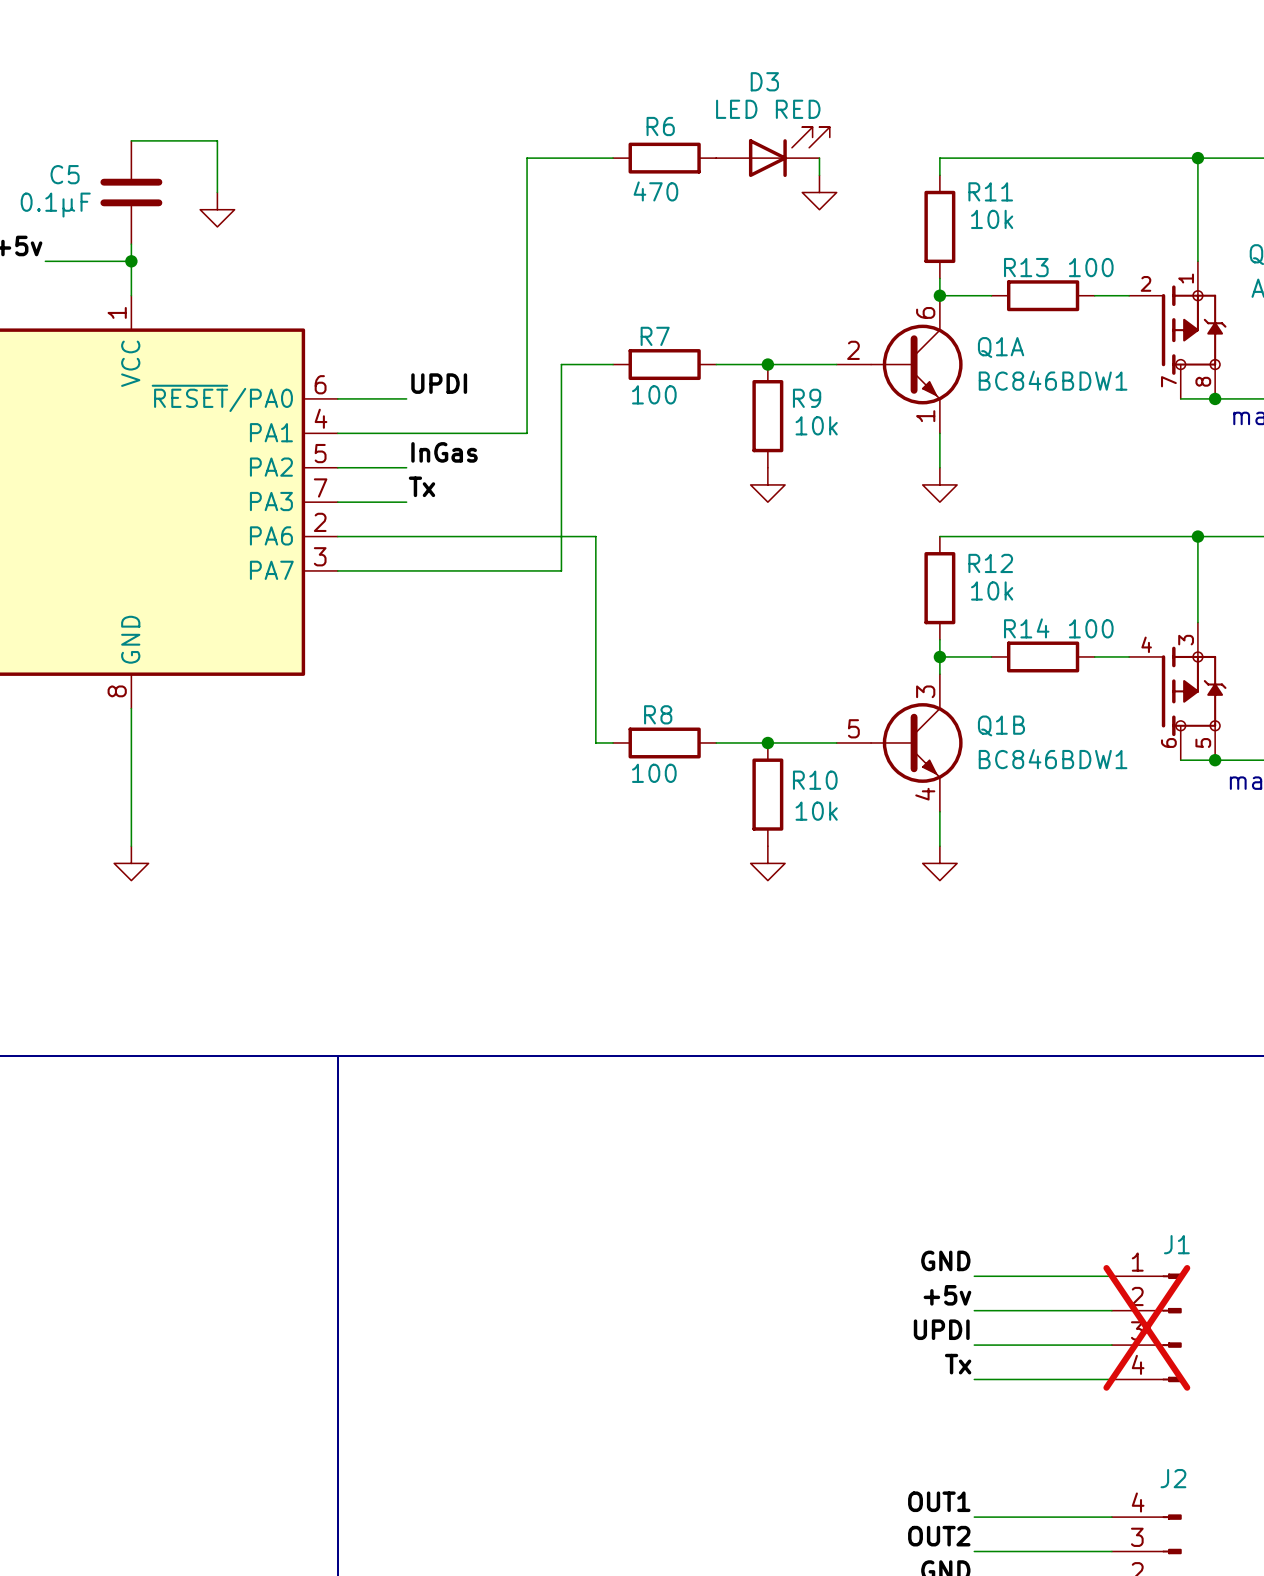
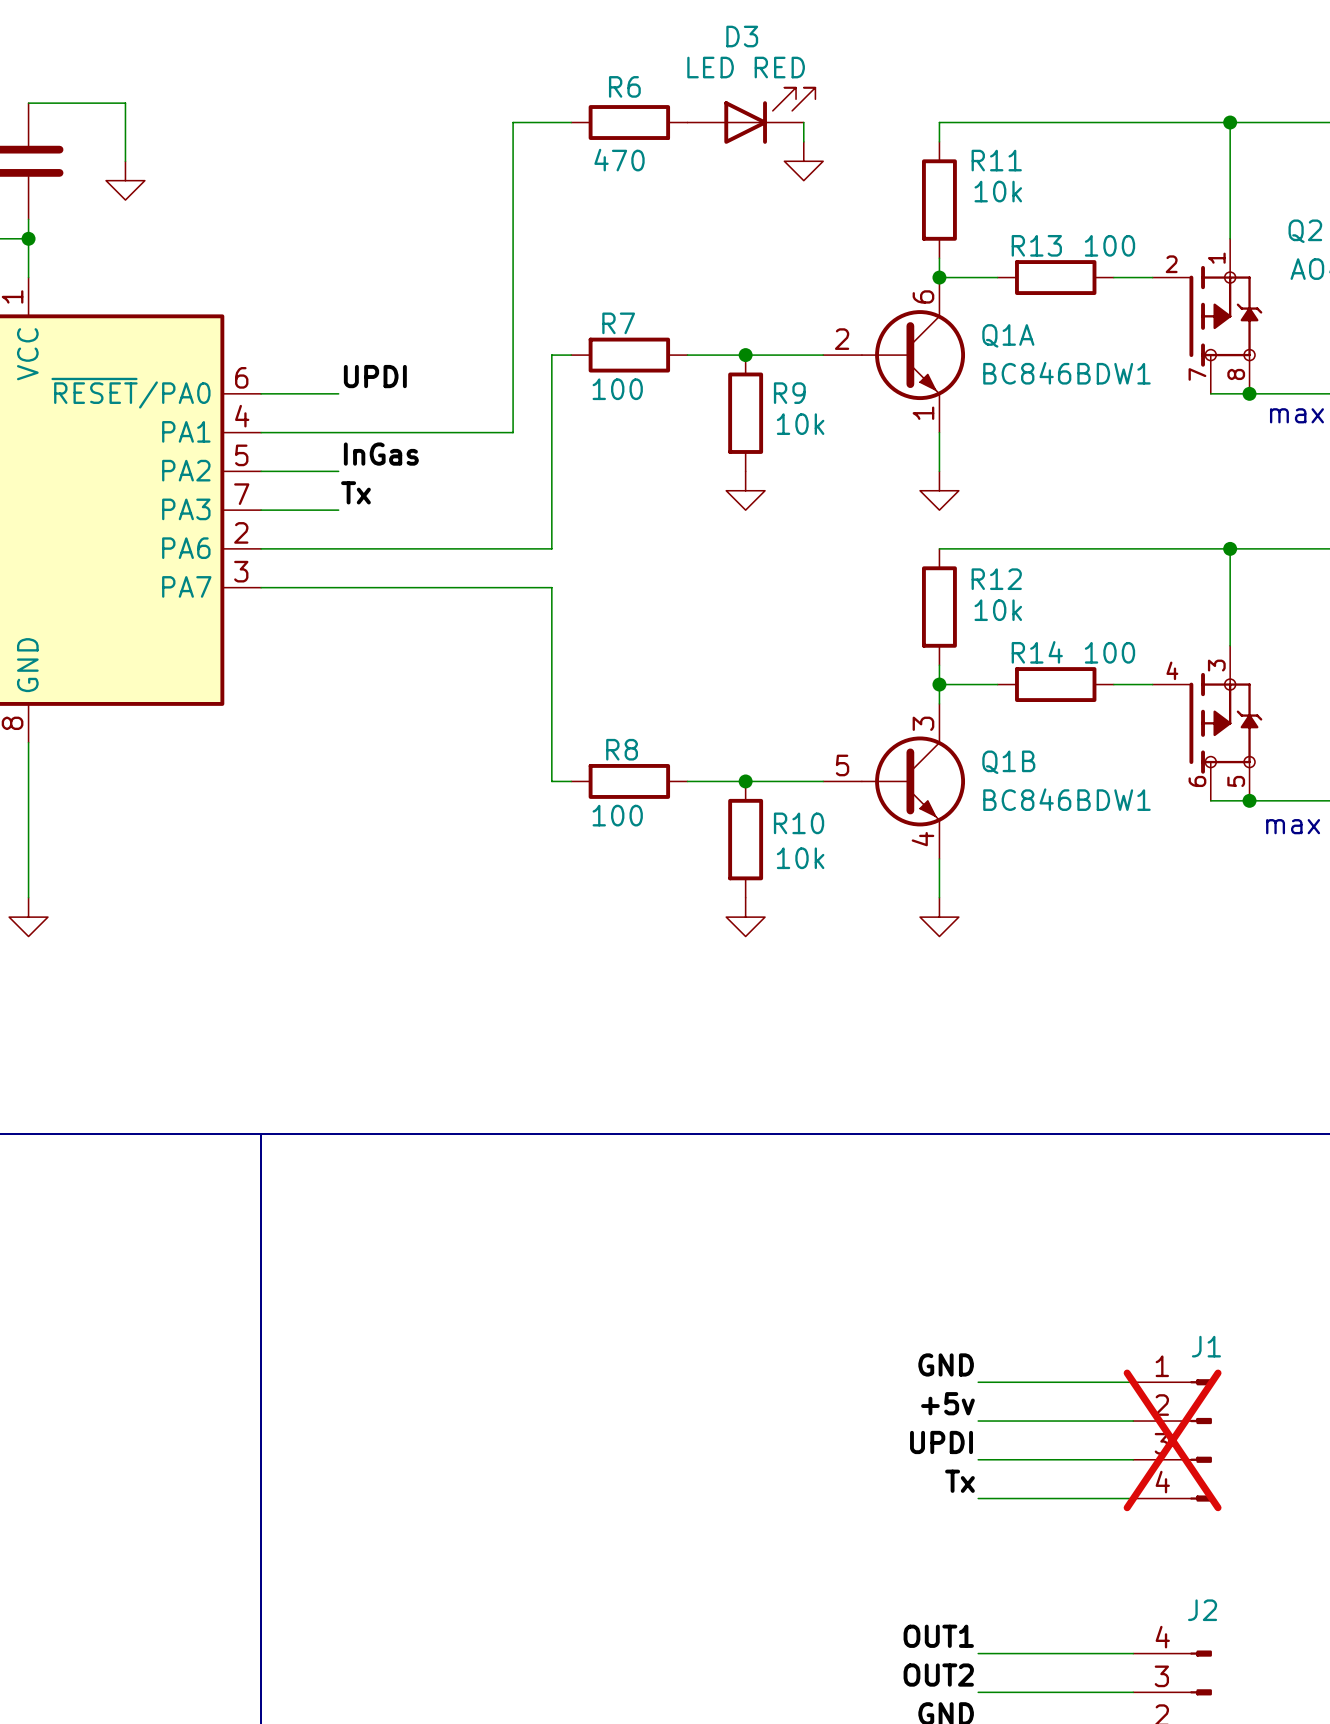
wire: (561, 158) (527, 158) (527, 433) -> (513, 122) (513, 355)
wire: (561, 364) (595, 364) -> (551, 548) (551, 355)
wire: (561, 433) (561, 570) -> (513, 432) (474, 432)
wire: (595, 536) (595, 570) -> (513, 587) (551, 587)

